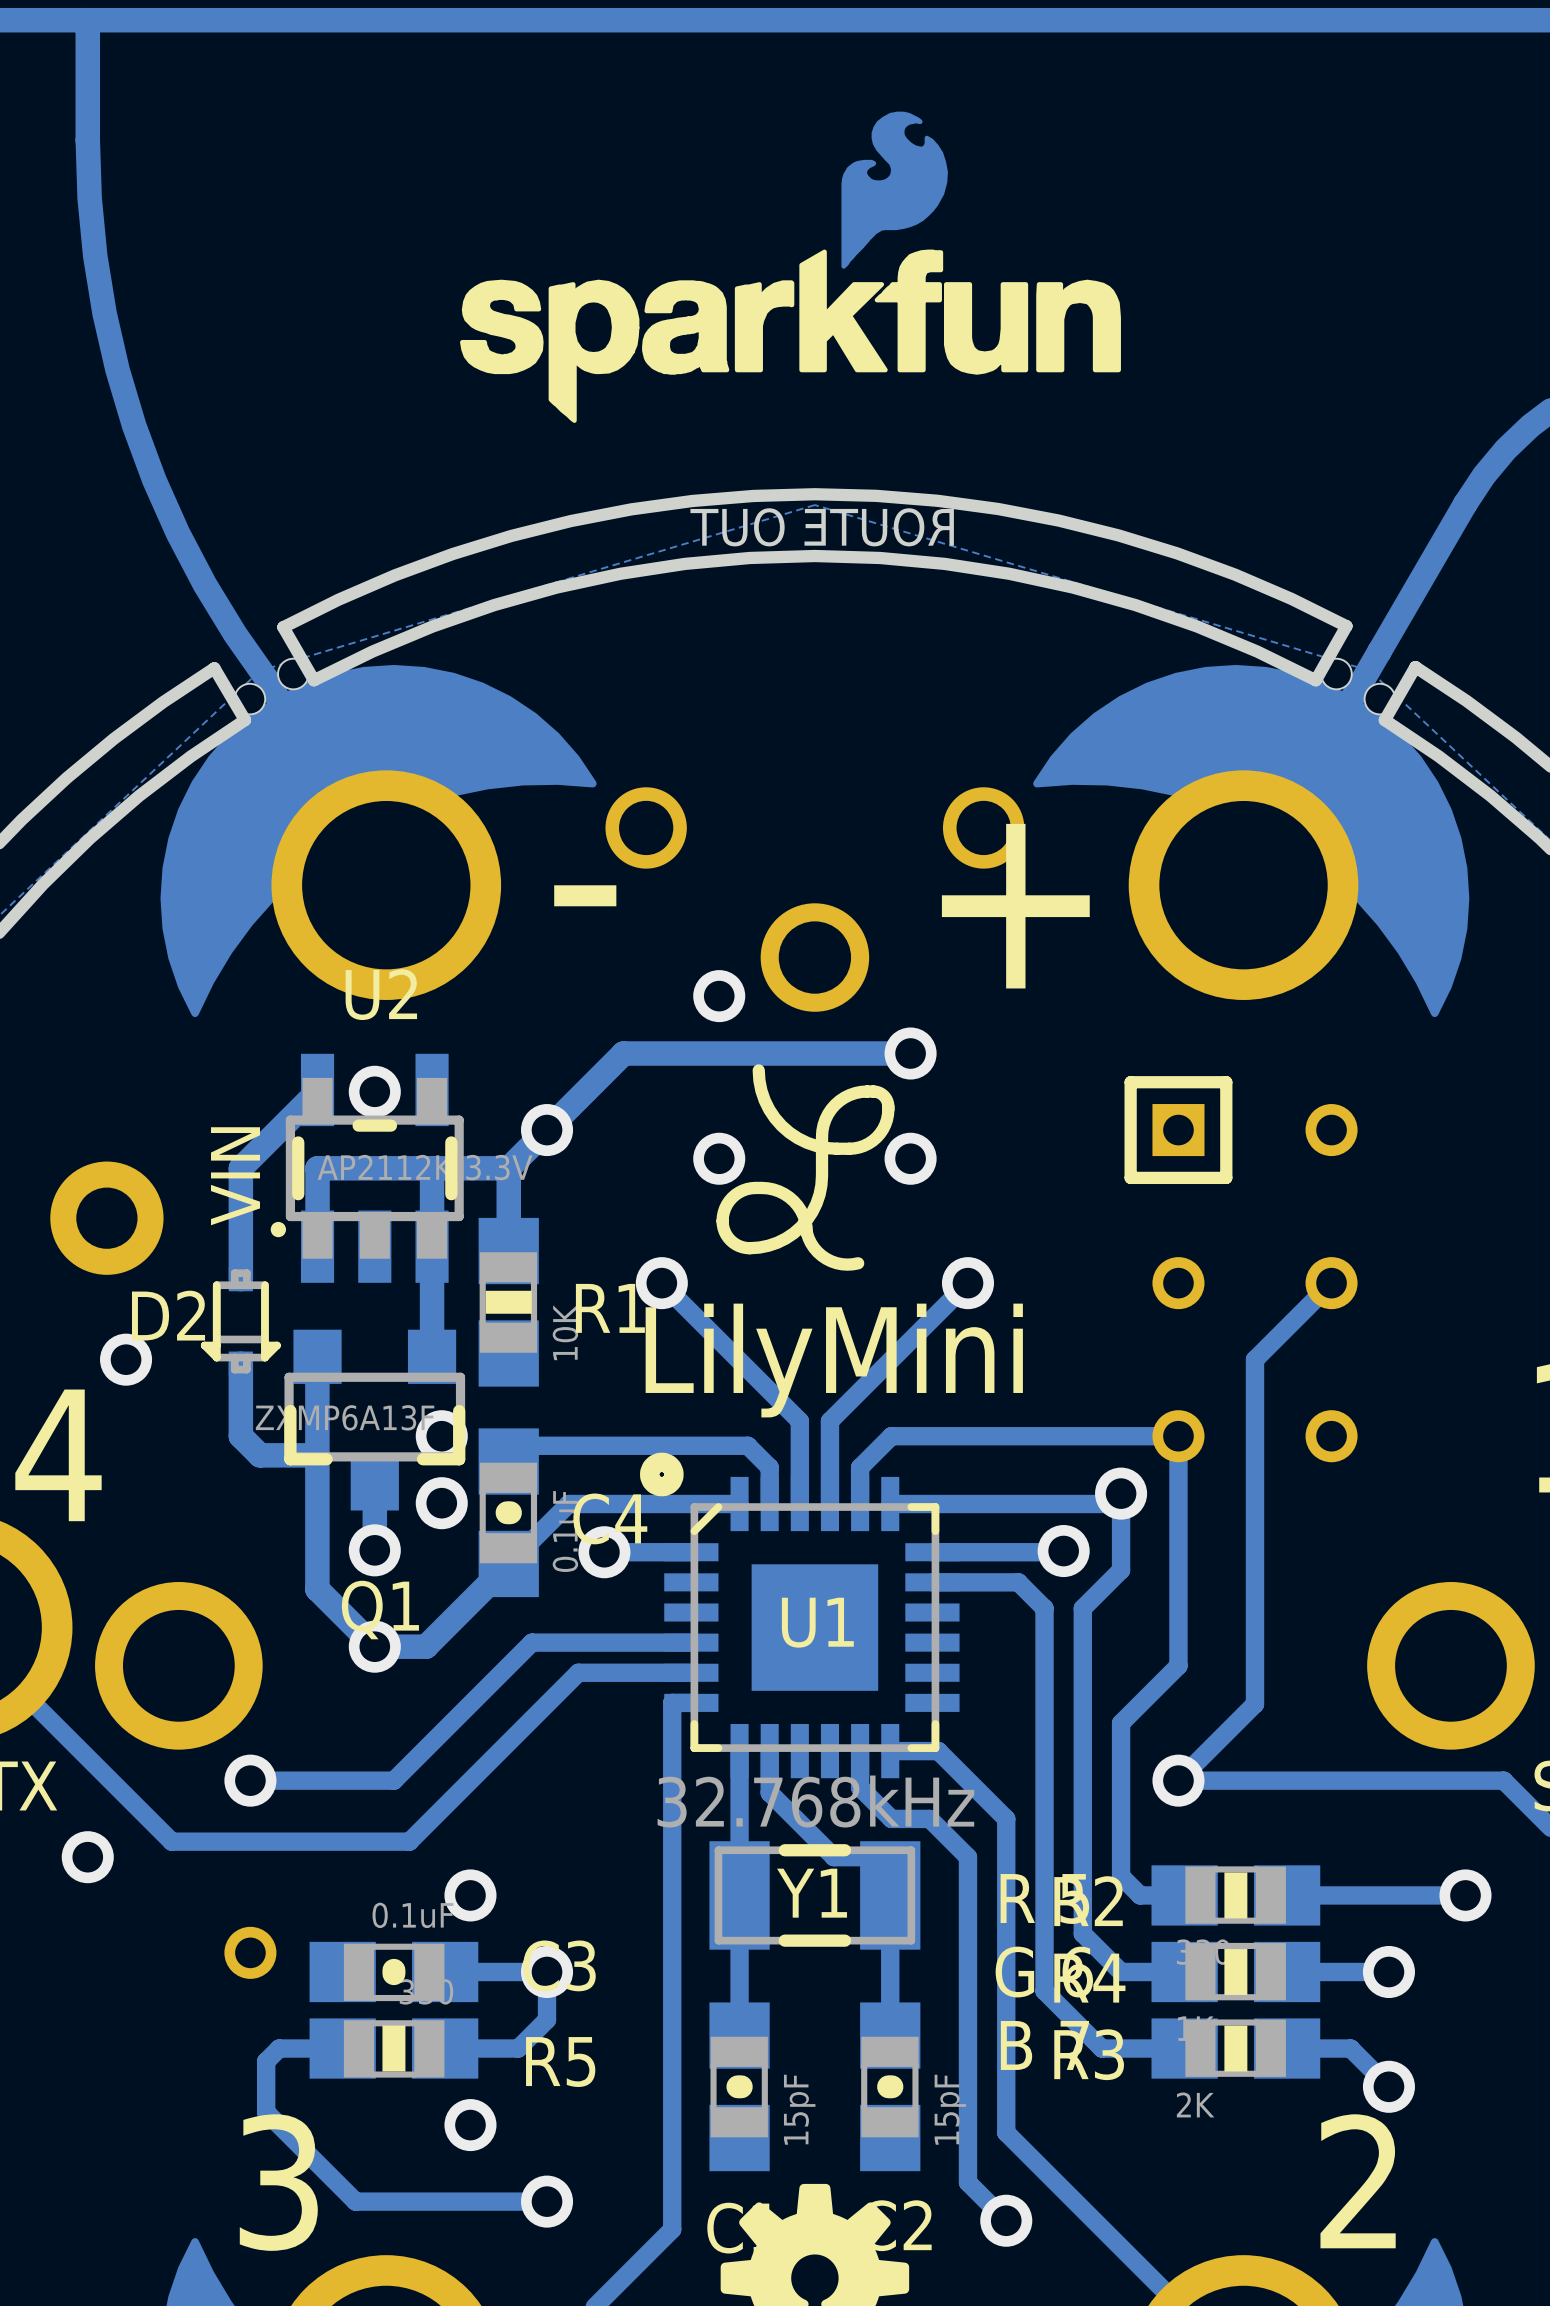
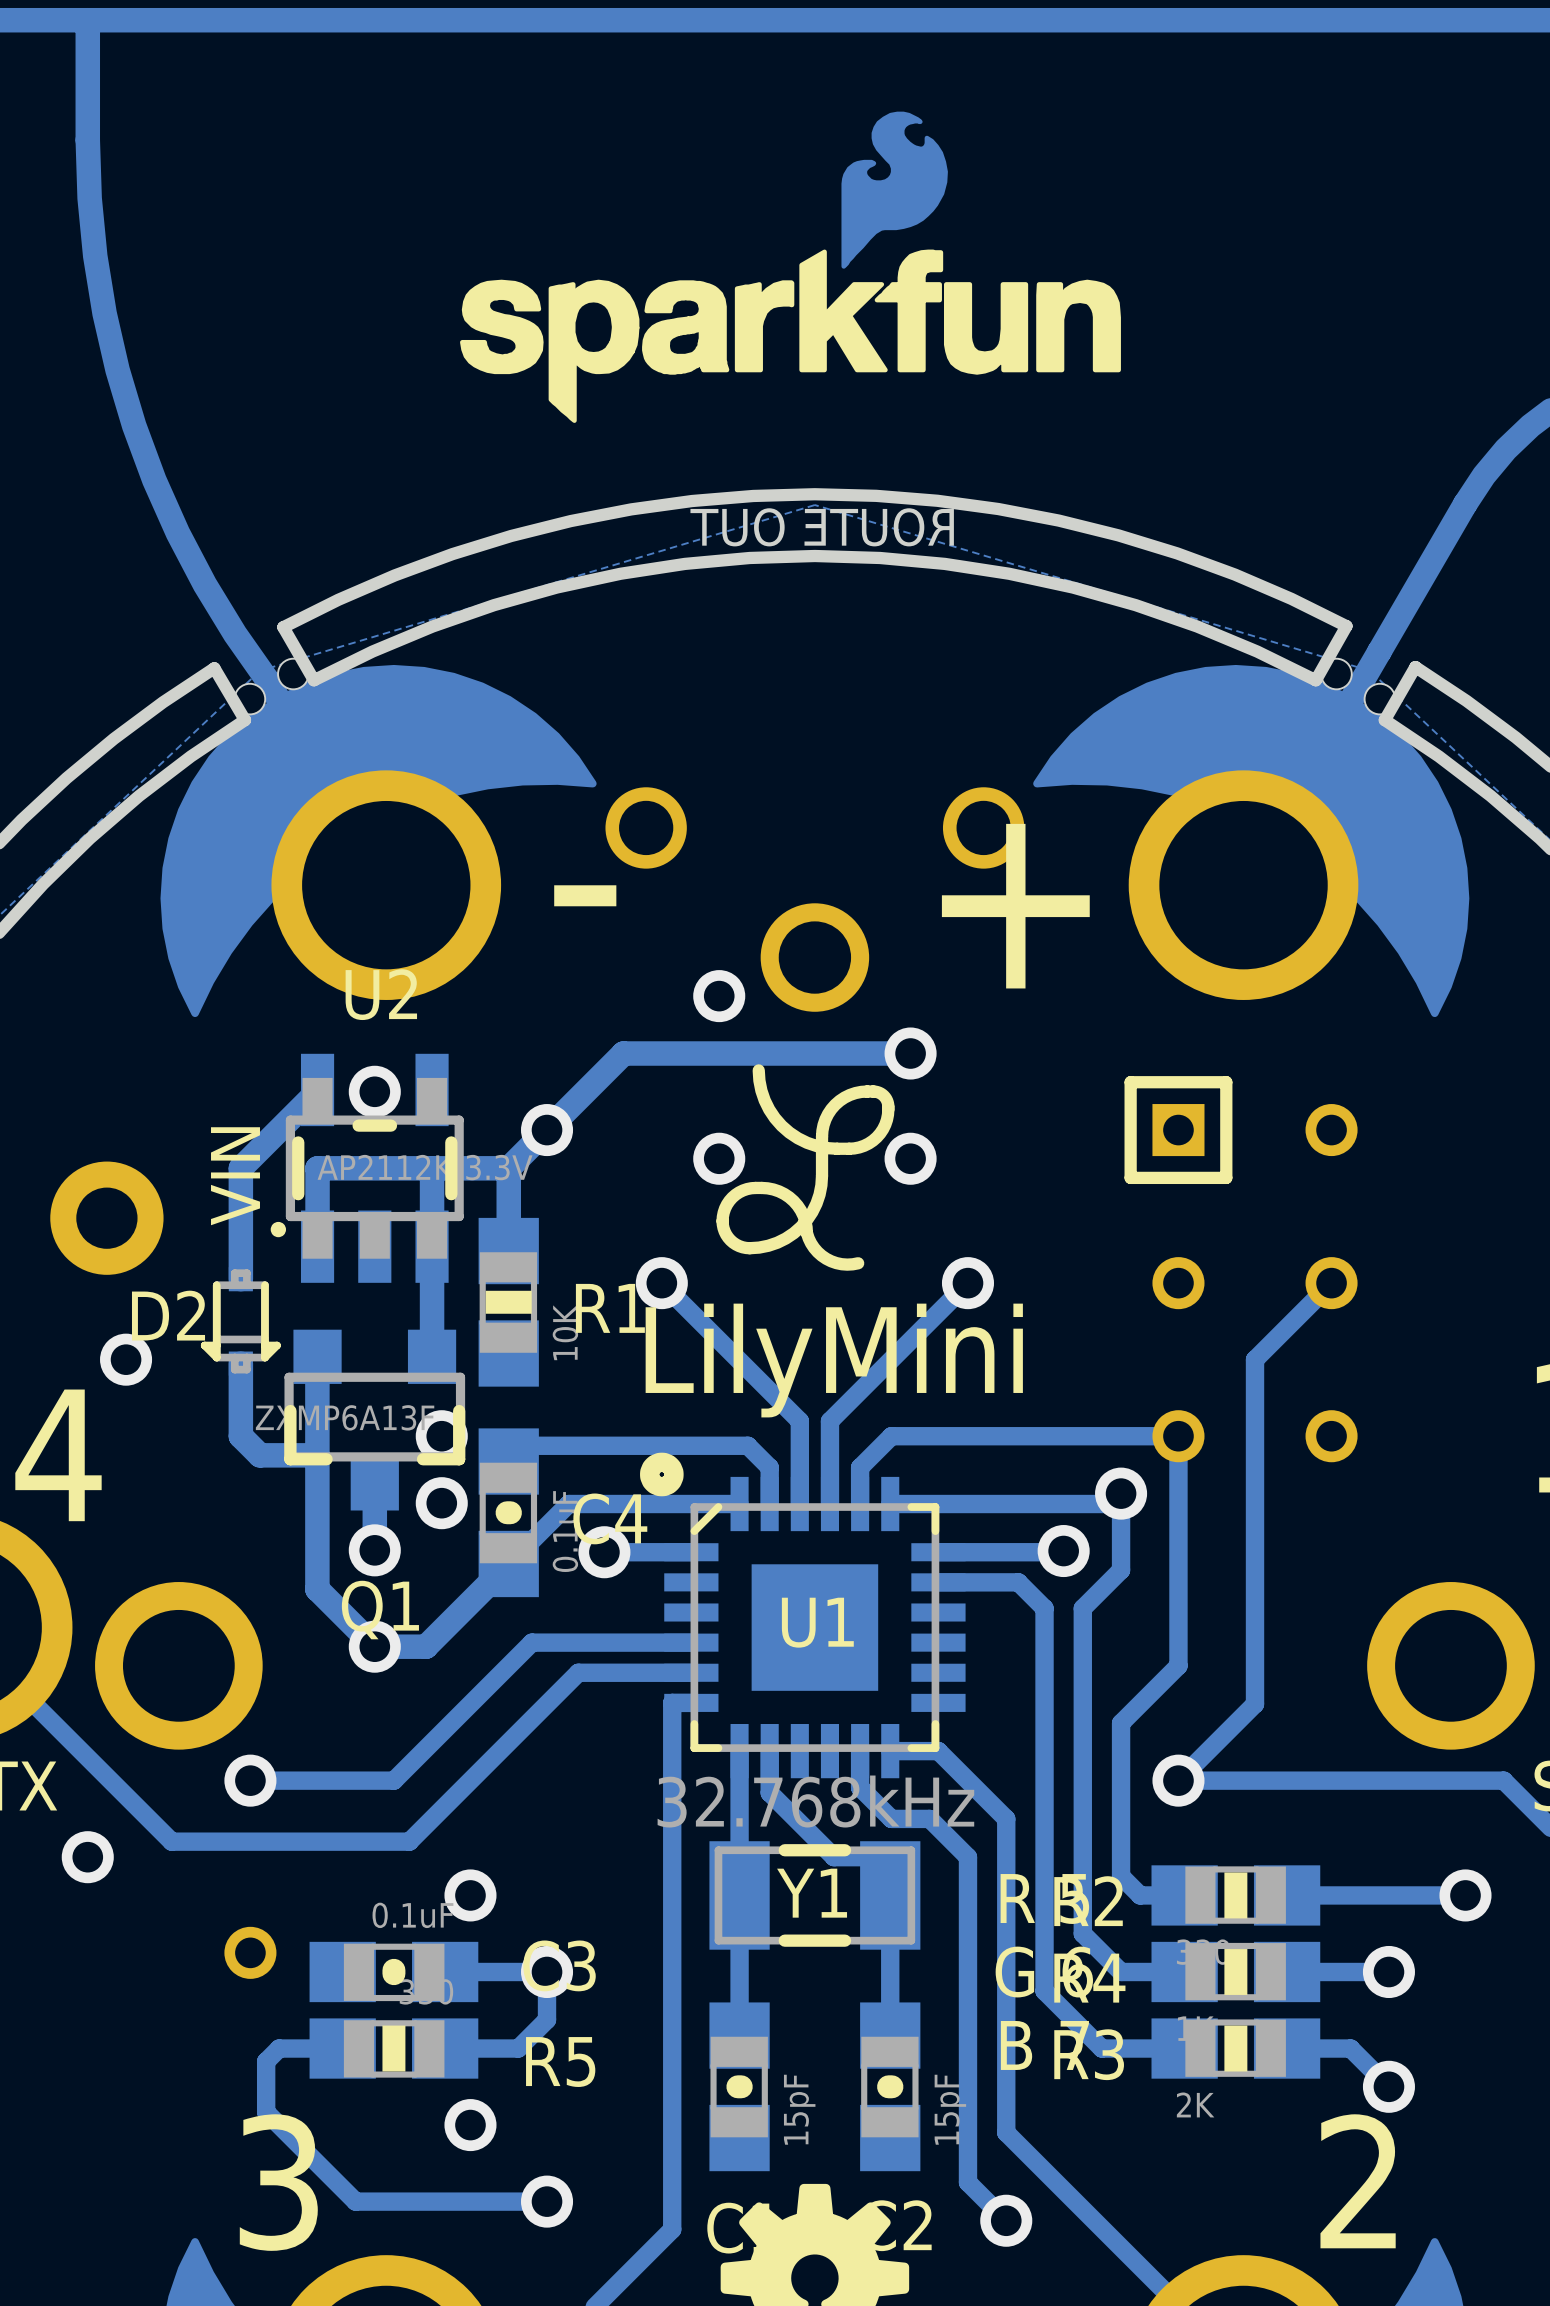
part footprint: [664, 1476, 960, 1779] -> [664, 1476, 966, 1779]

